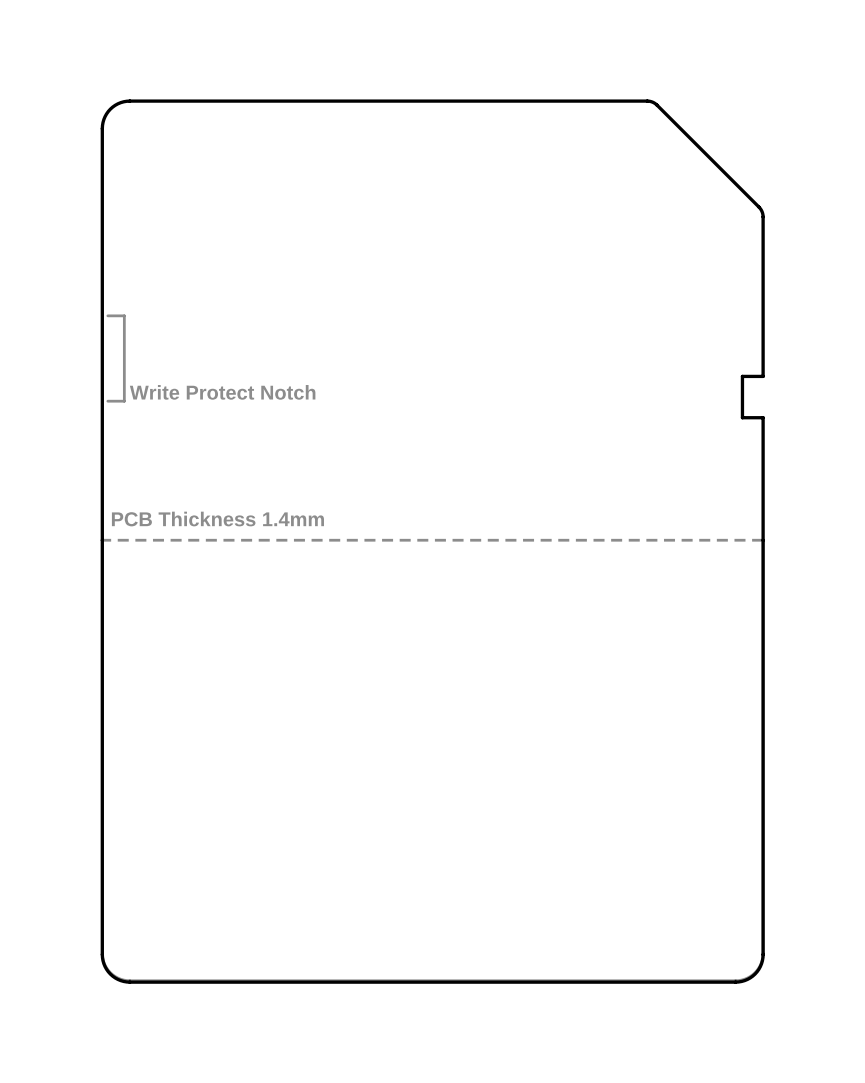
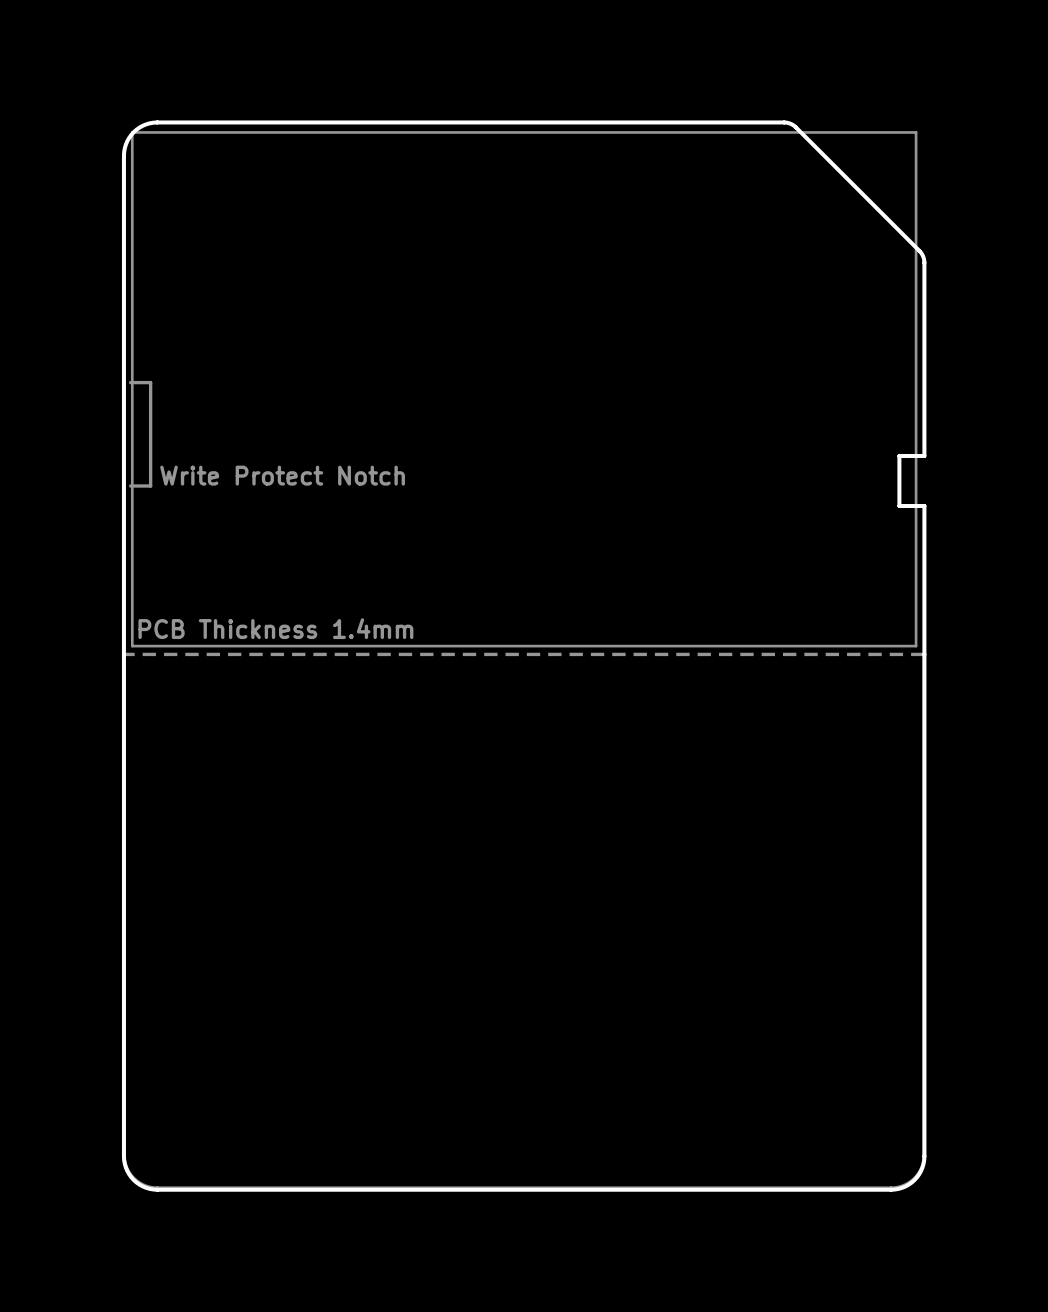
line: none -> (132, 132) (916, 132) (916, 646) (132, 646) (132, 132)

